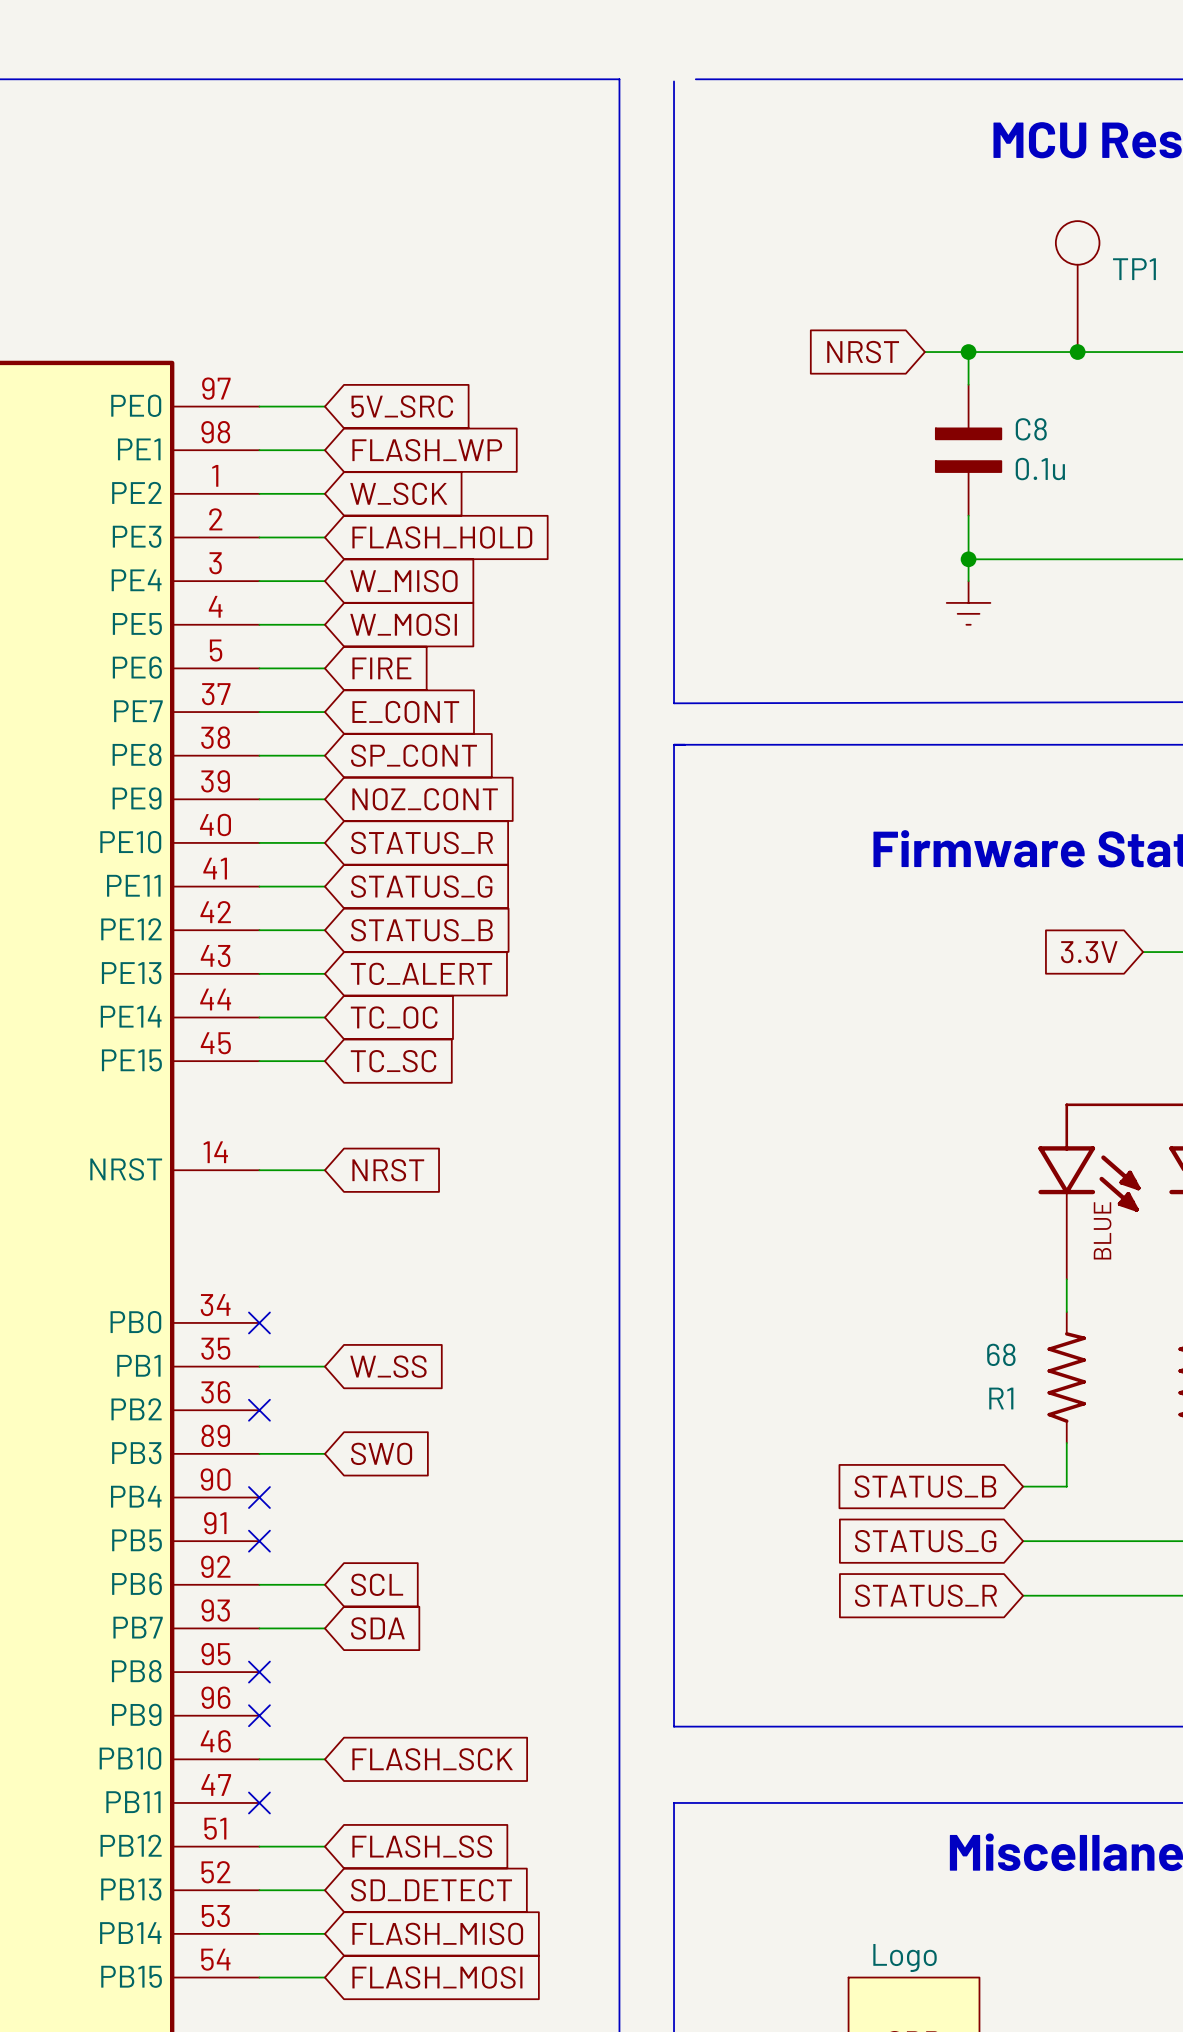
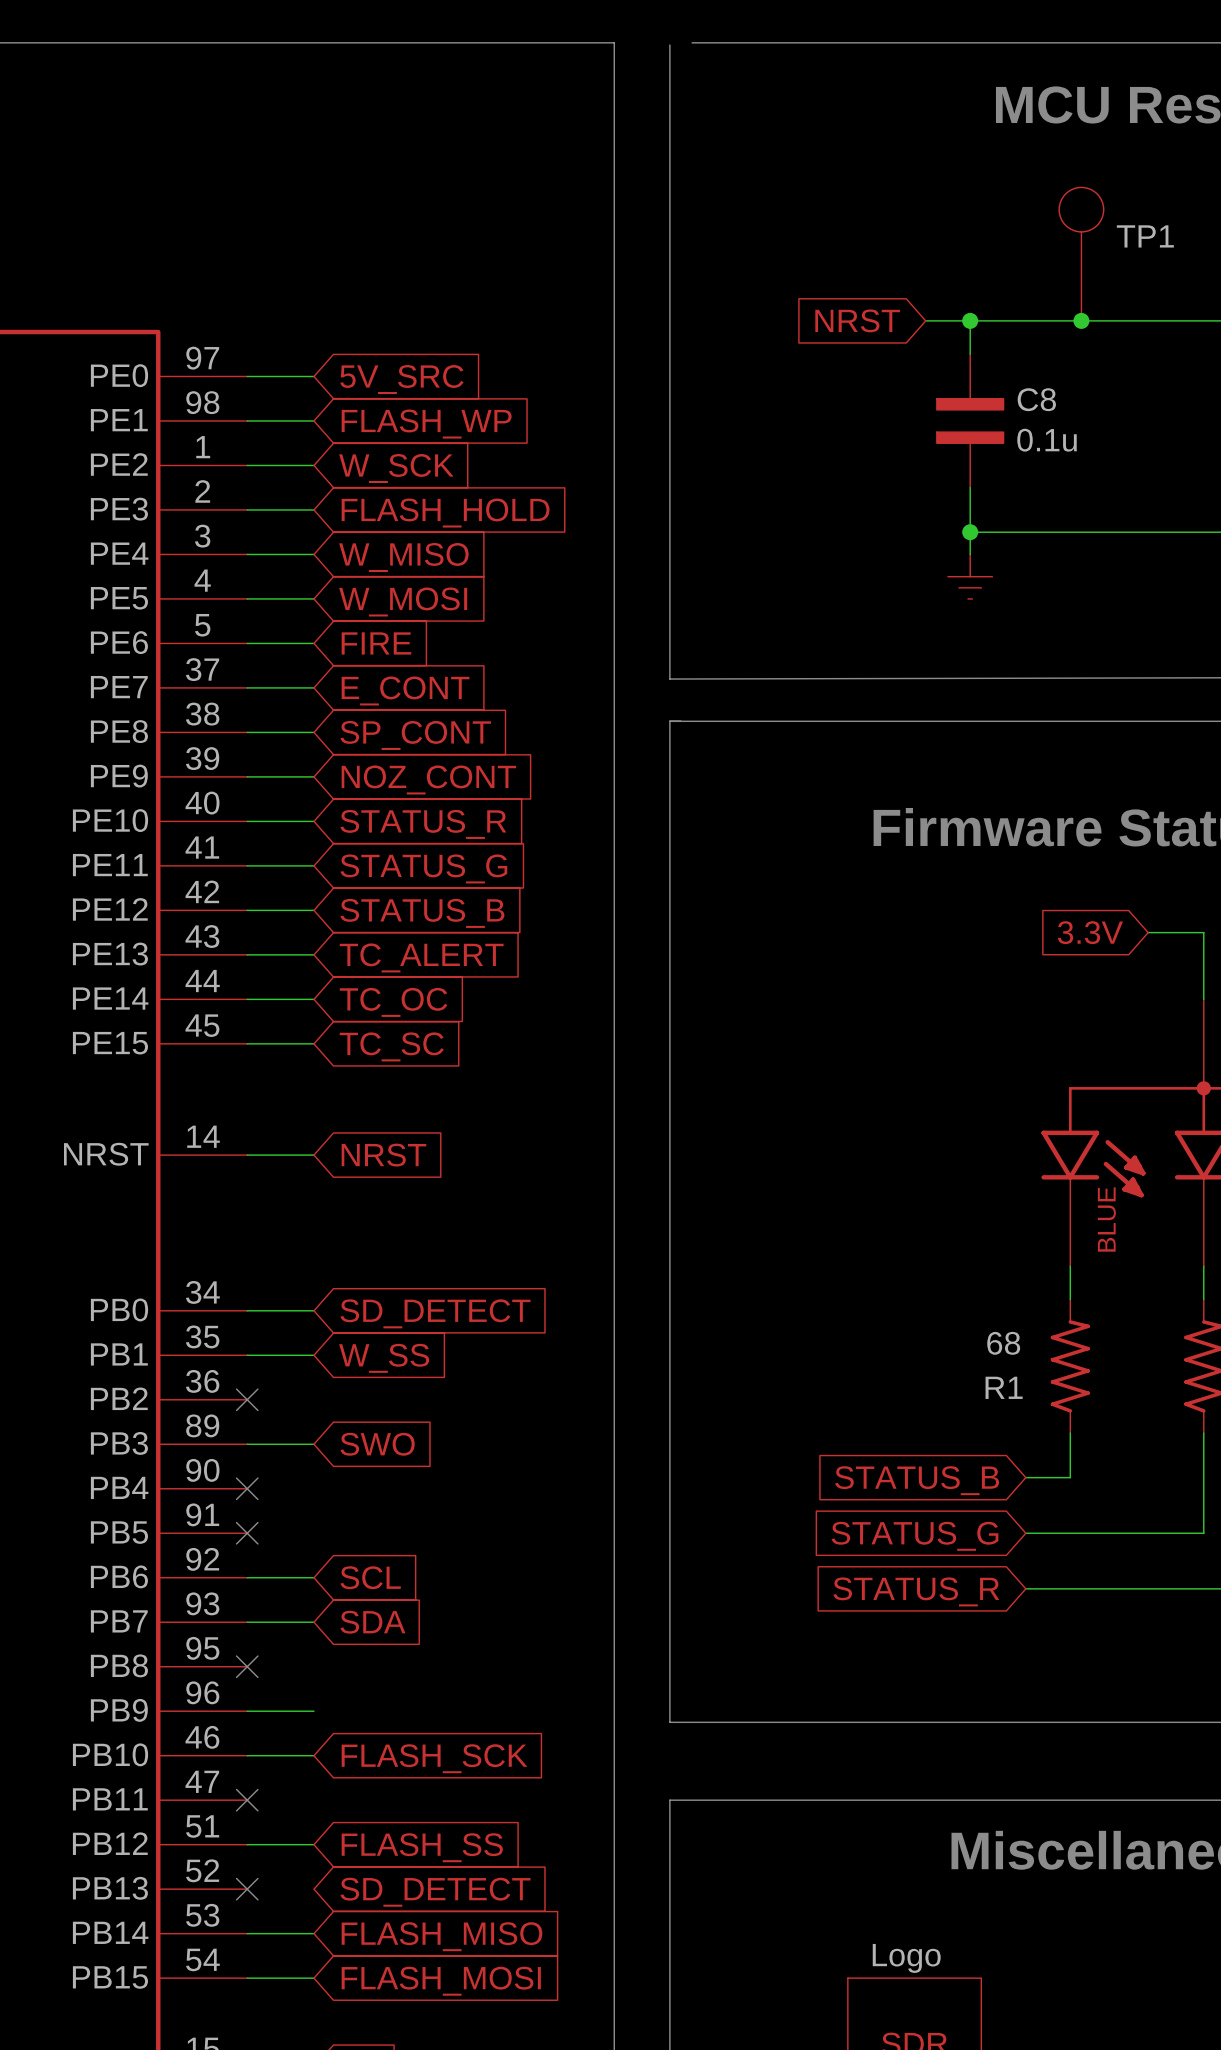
wire: none -> (247, 1310) (313, 1310)
no-connect mark: (259, 1322) -> none
global label: none -> SD_DETECT (435, 1313)
no-connect mark: (259, 1715) -> none
wire: (259, 1890) (324, 1890) -> (247, 1711) (313, 1711)
no-connect mark: none -> (247, 1889)

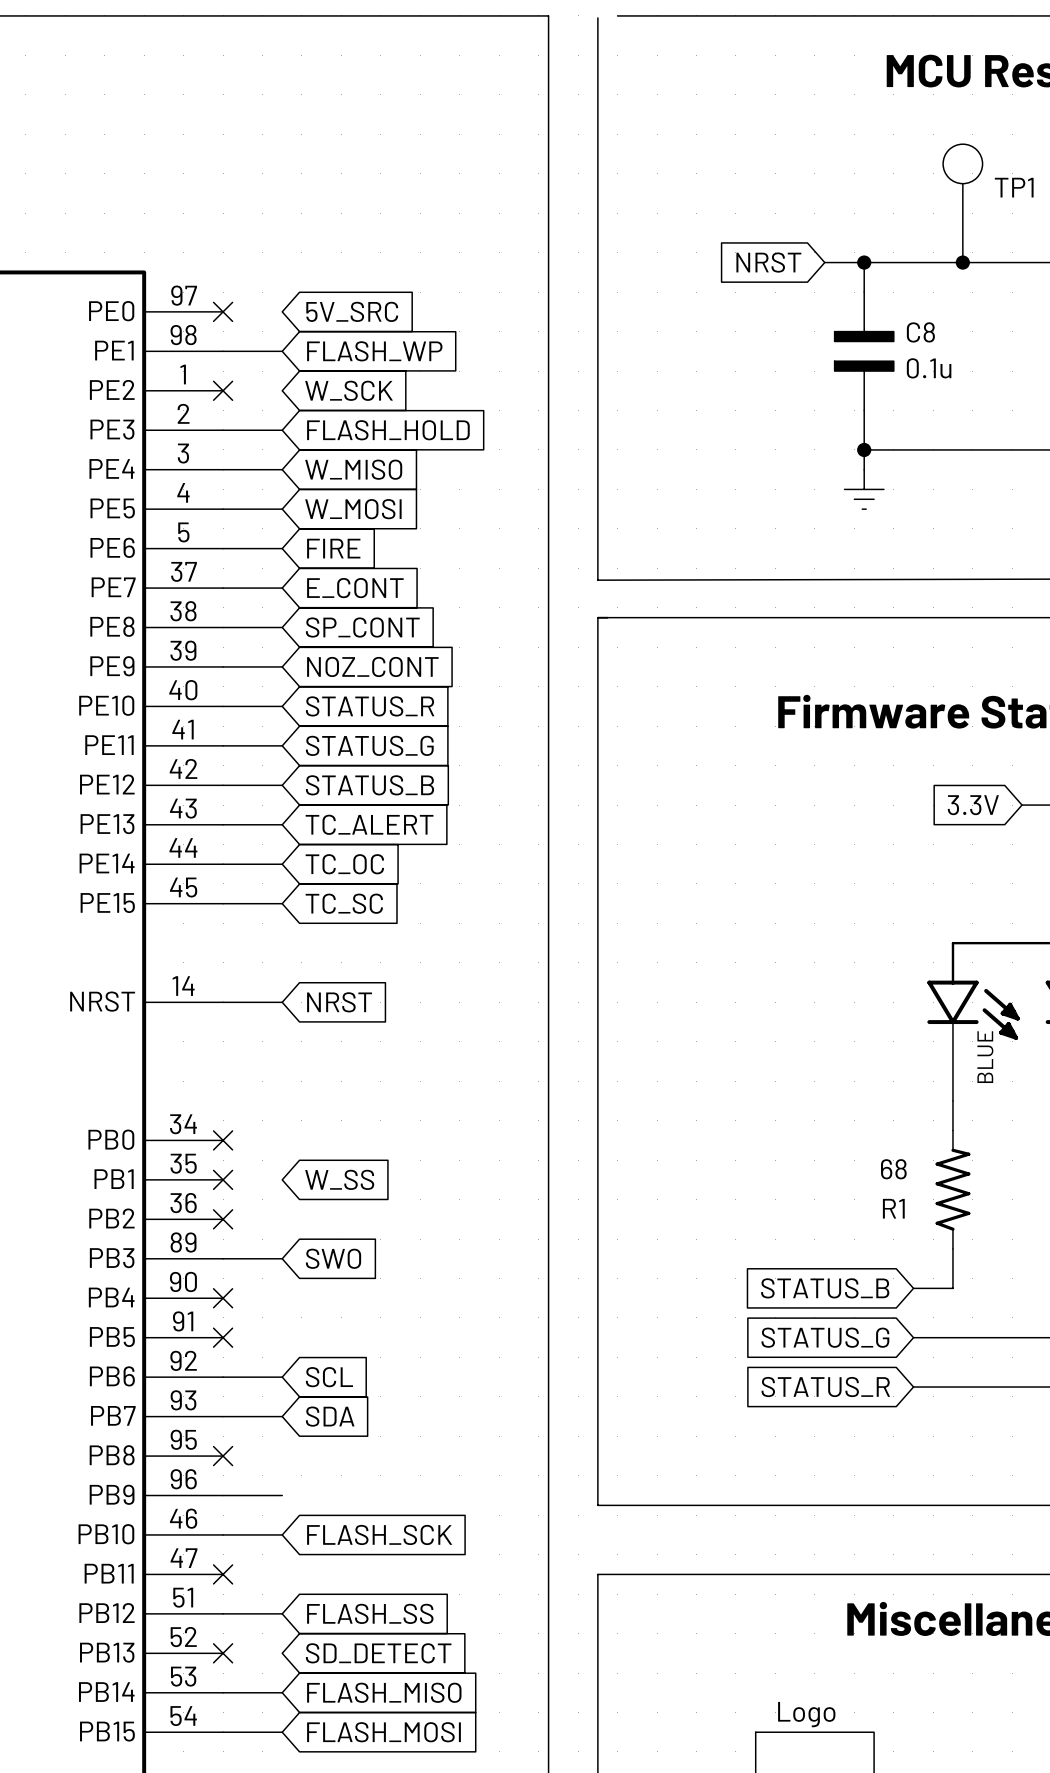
wire: (247, 376) (313, 376) -> none
no-connect mark: none -> (223, 311)
wire: (247, 465) (313, 465) -> none
no-connect mark: none -> (223, 390)
wire: (247, 1310) (313, 1310) -> none
no-connect mark: none -> (223, 1140)
global label: SD_DETECT (435, 1313) -> none
wire: (247, 1355) (313, 1355) -> none
no-connect mark: none -> (223, 1179)

